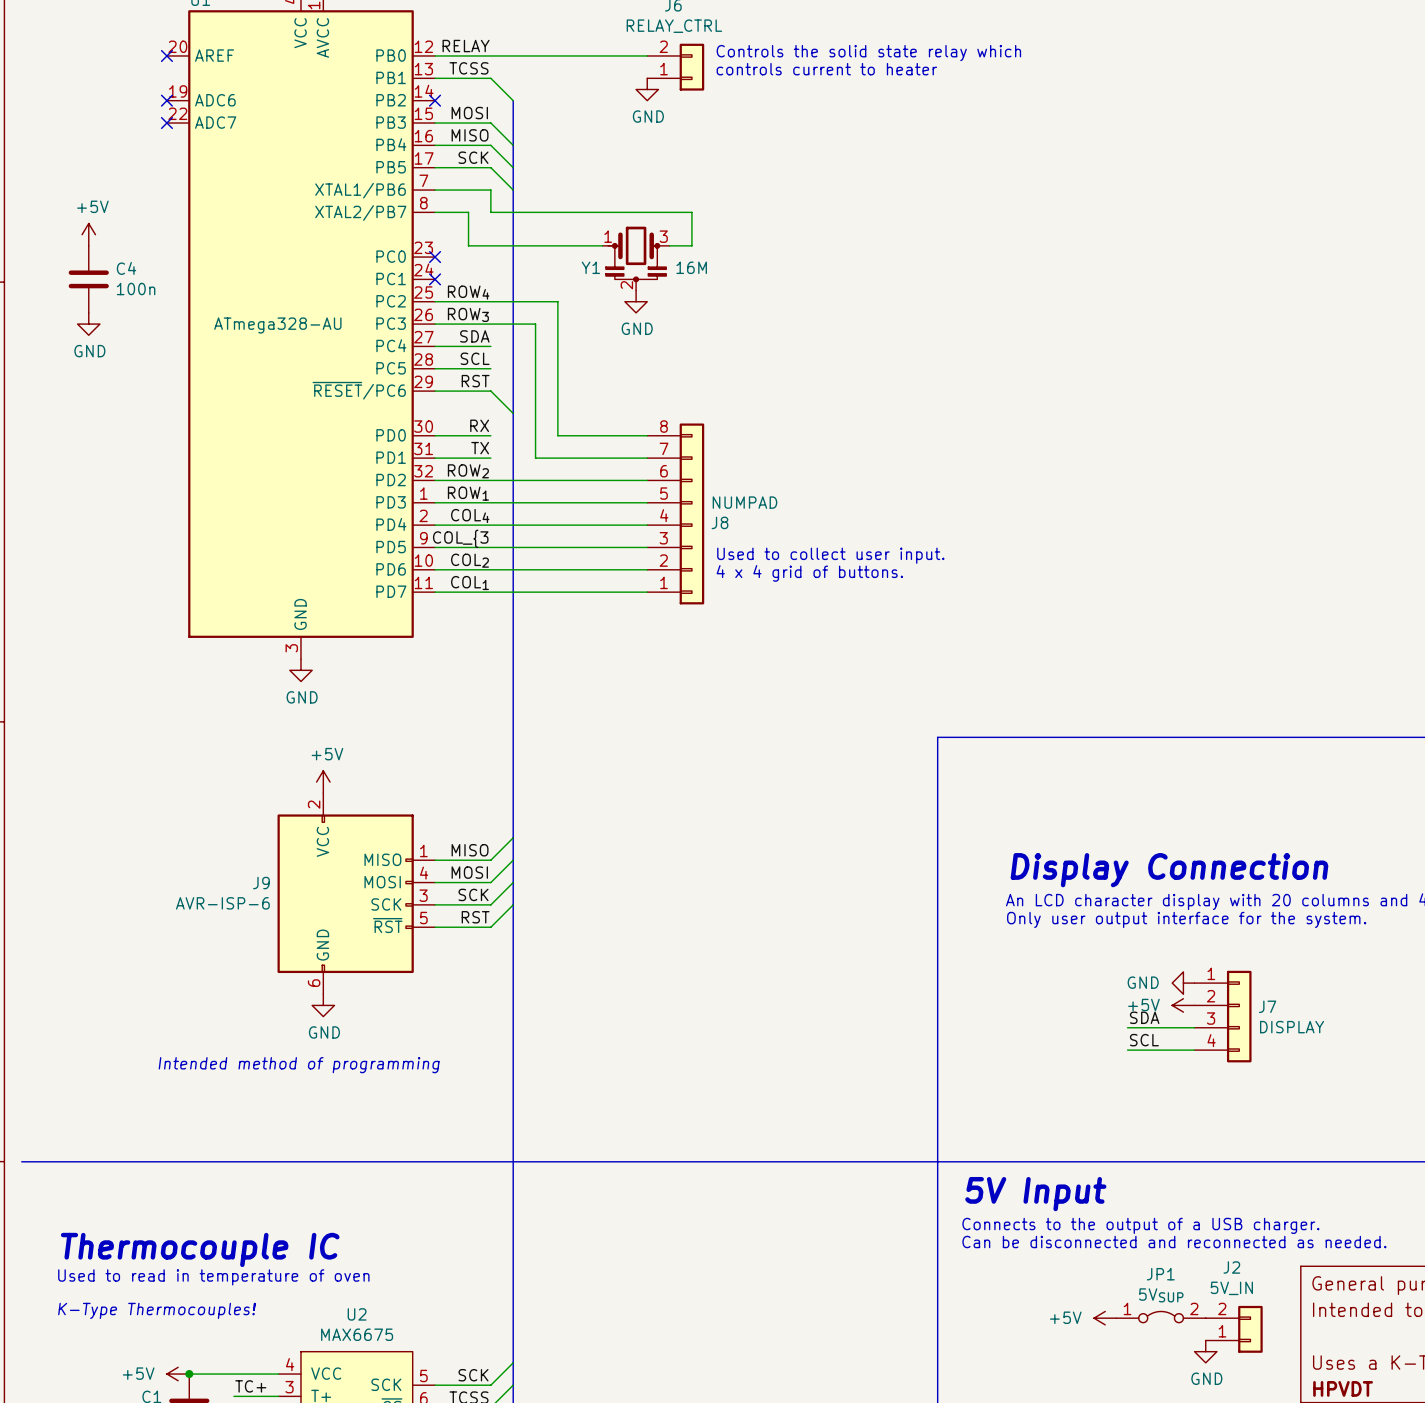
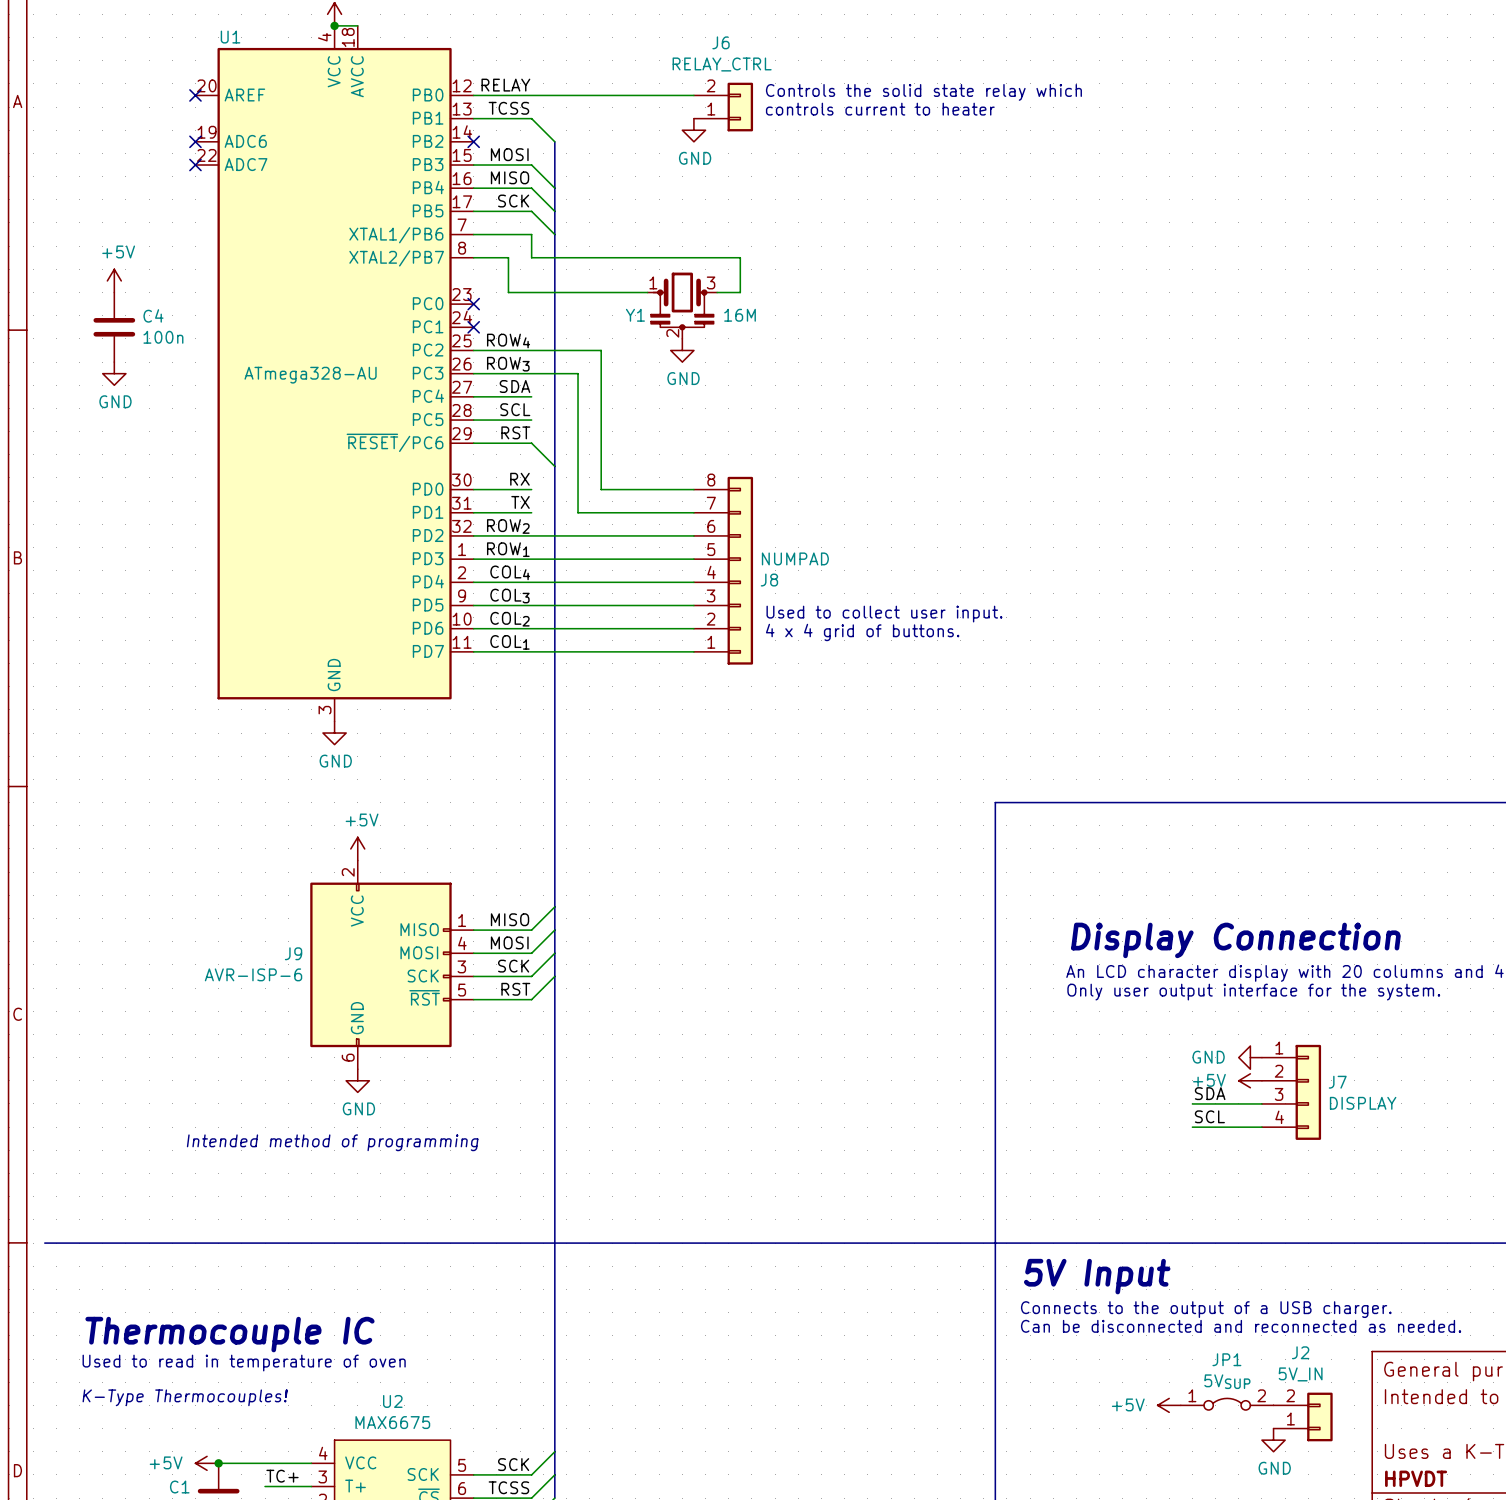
label: COL_{3 (460, 538) -> COL3 (509, 596)

